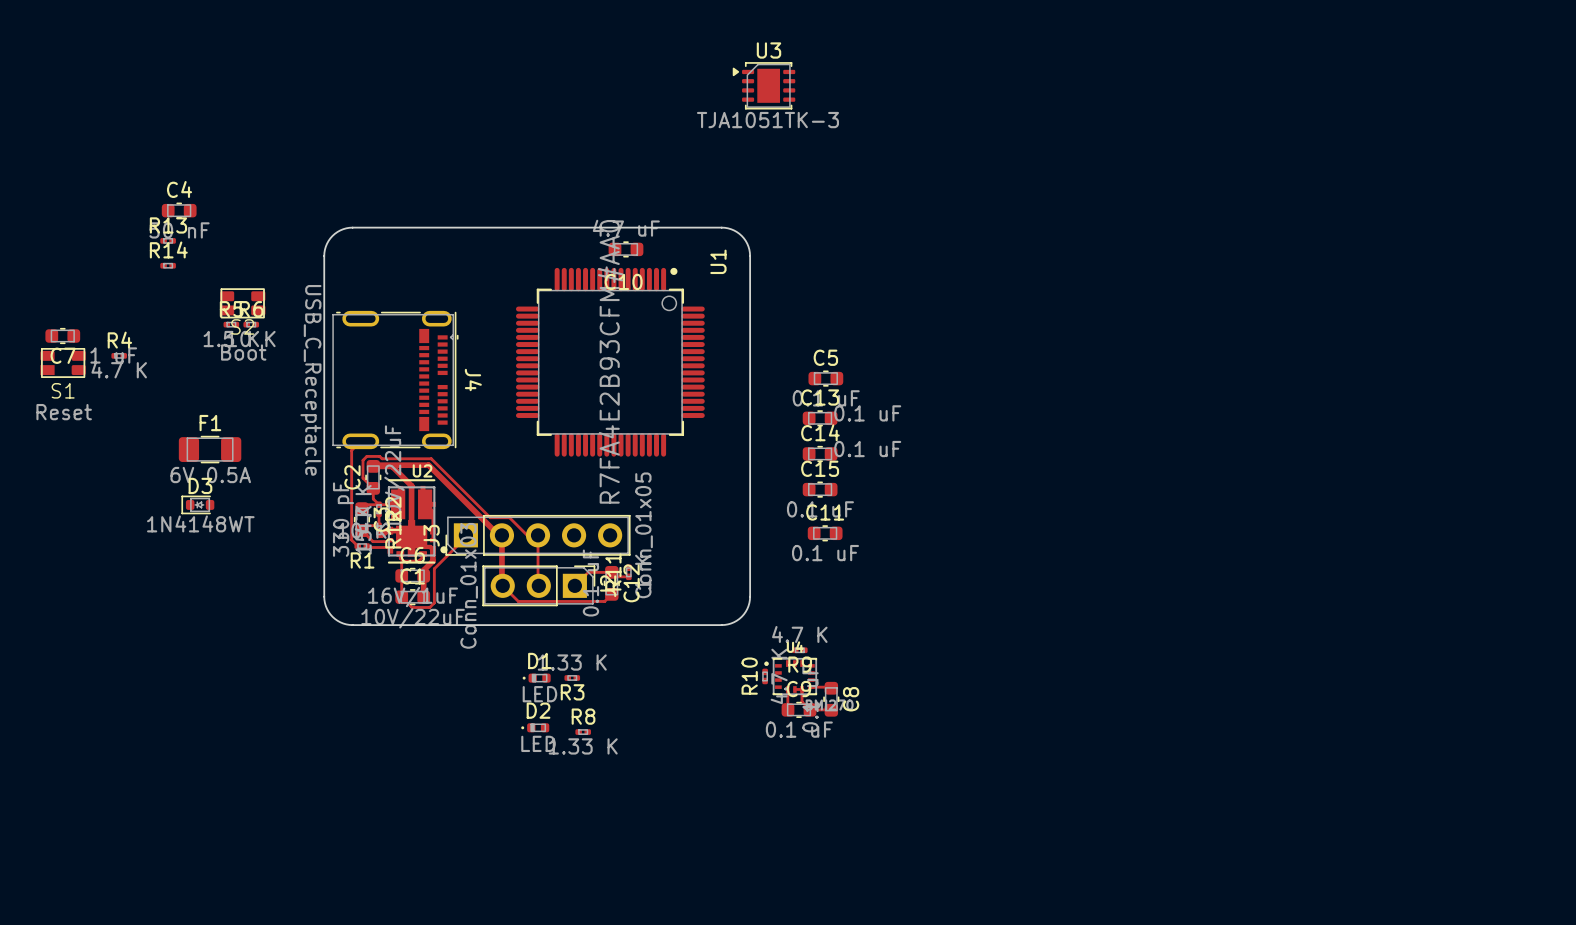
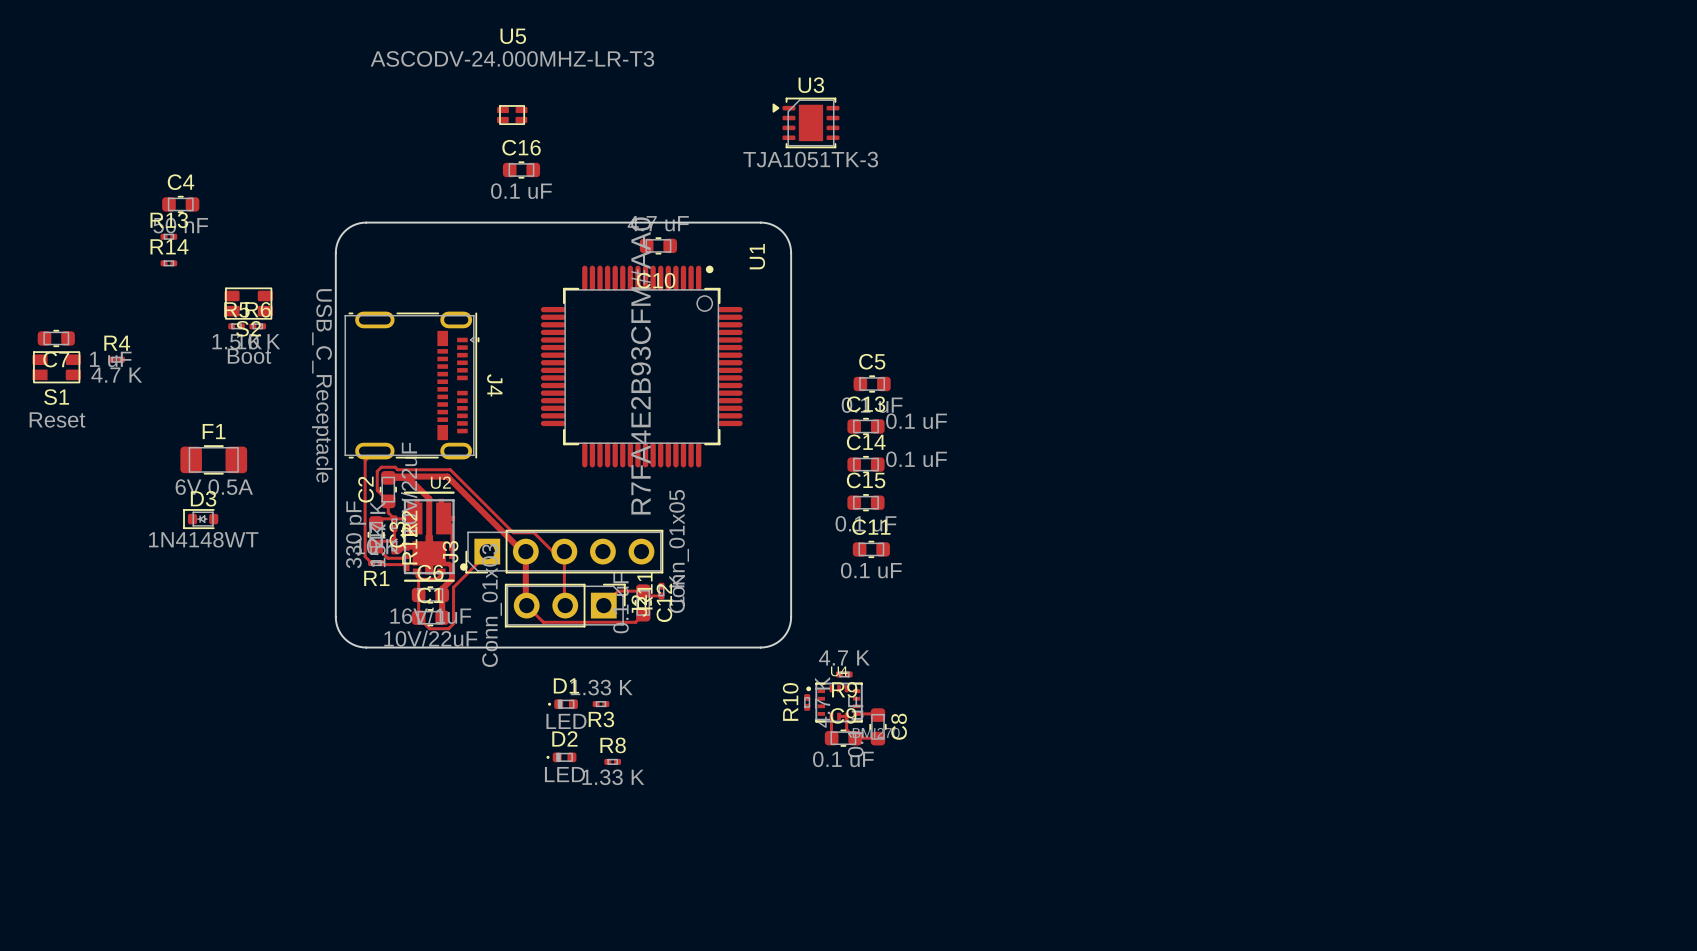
U3 position: (764, 85) -> (806, 122)
U5: none -> ASCODV-24.000MHZ-LR-T3 (512, 115)
C16: none -> 0.1 uF (521, 170)

